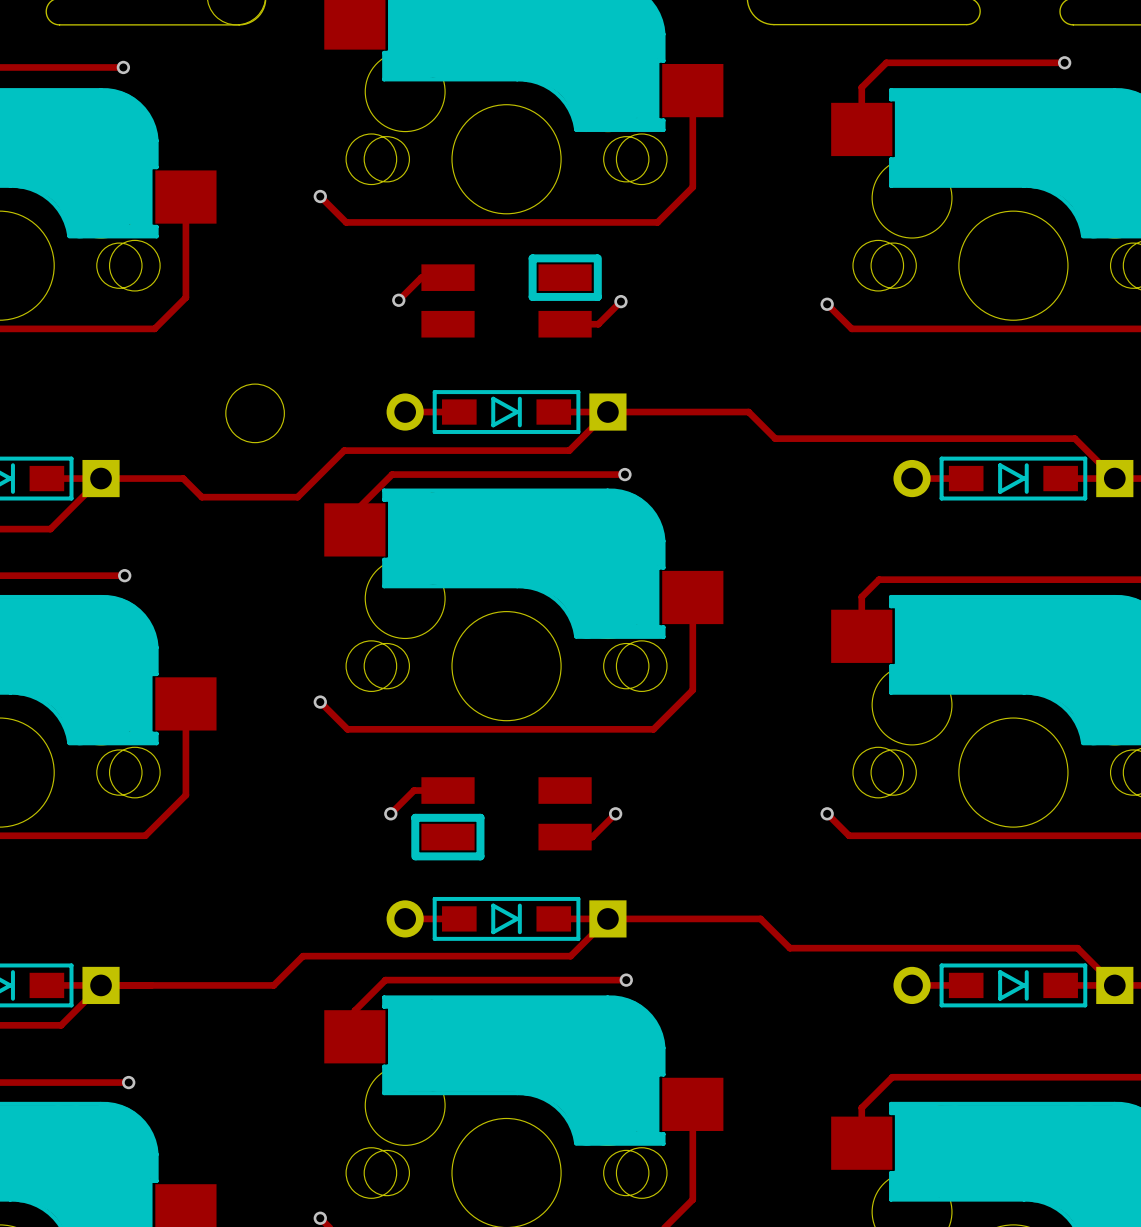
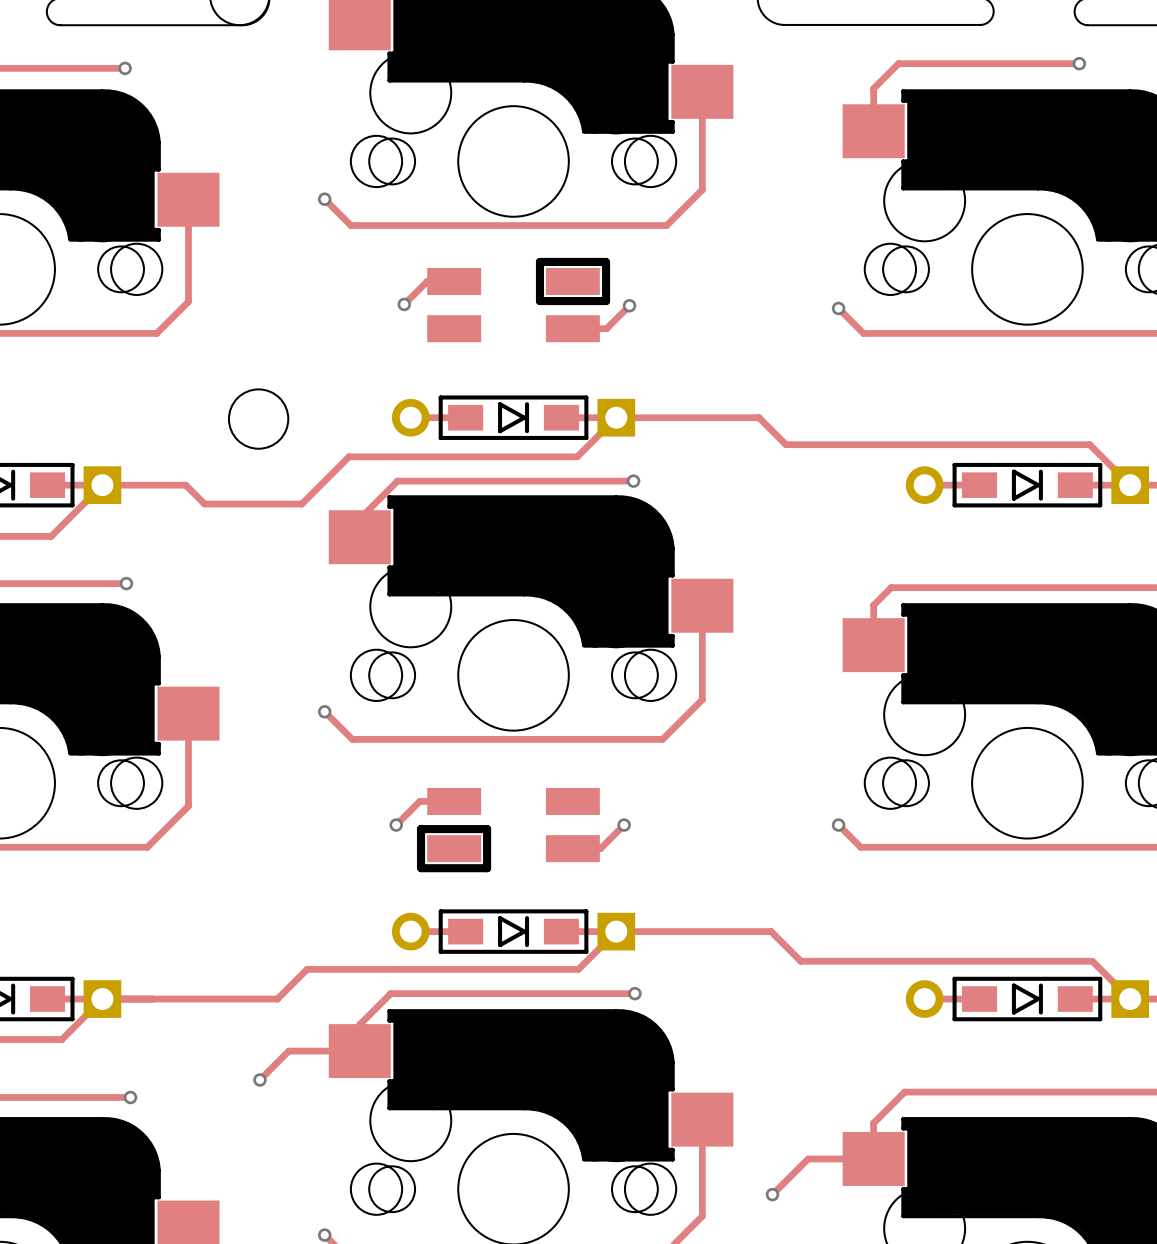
track: none -> (359, 1051) (288, 1051) (259, 1079)
via: none -> (259, 1079)
track: none -> (873, 1159) (808, 1159) (772, 1194)
via: none -> (772, 1194)

